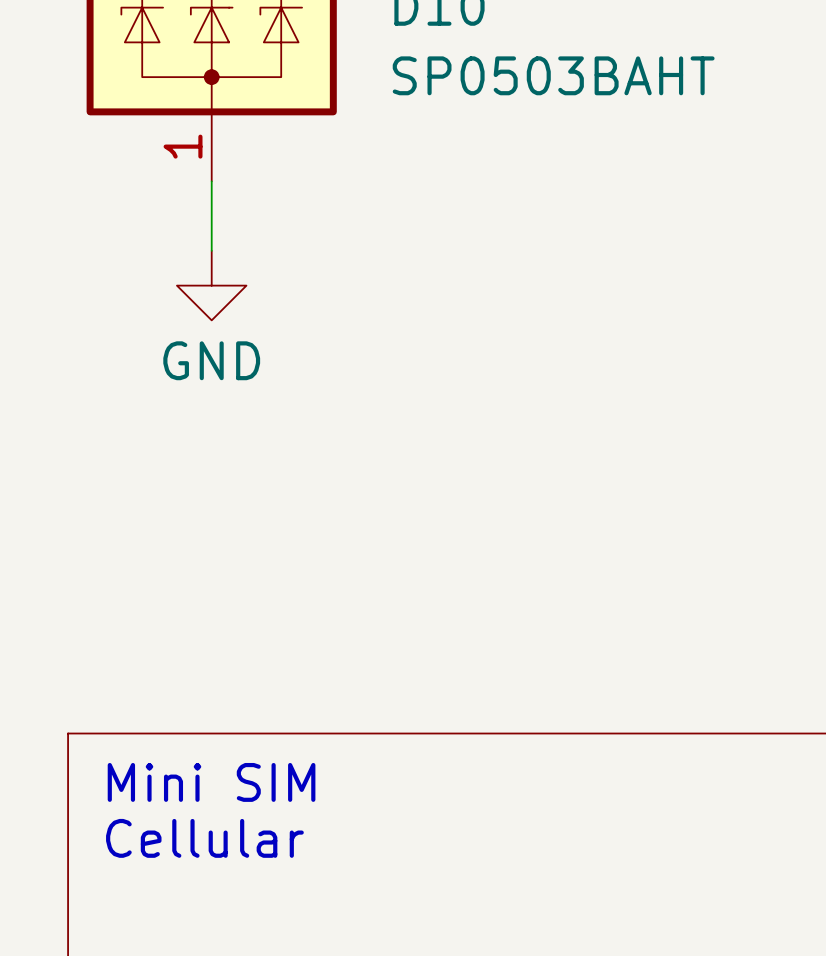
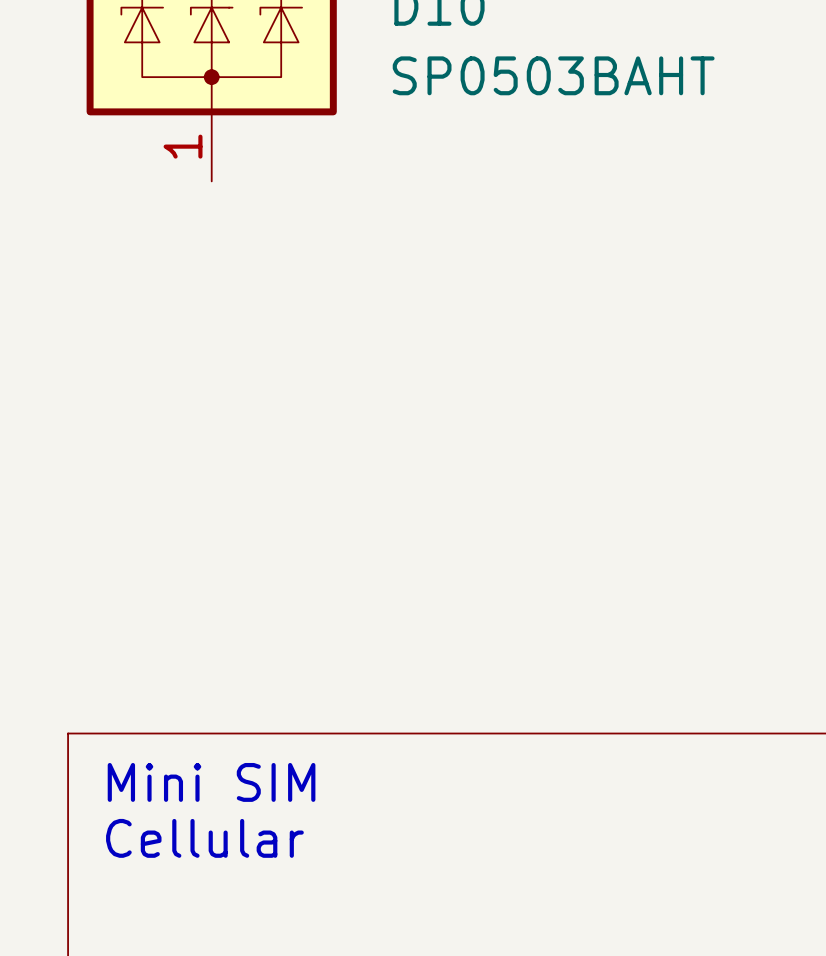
wire: (211, 181) (211, 250) -> none
power symbol: GND (211, 285) -> none

